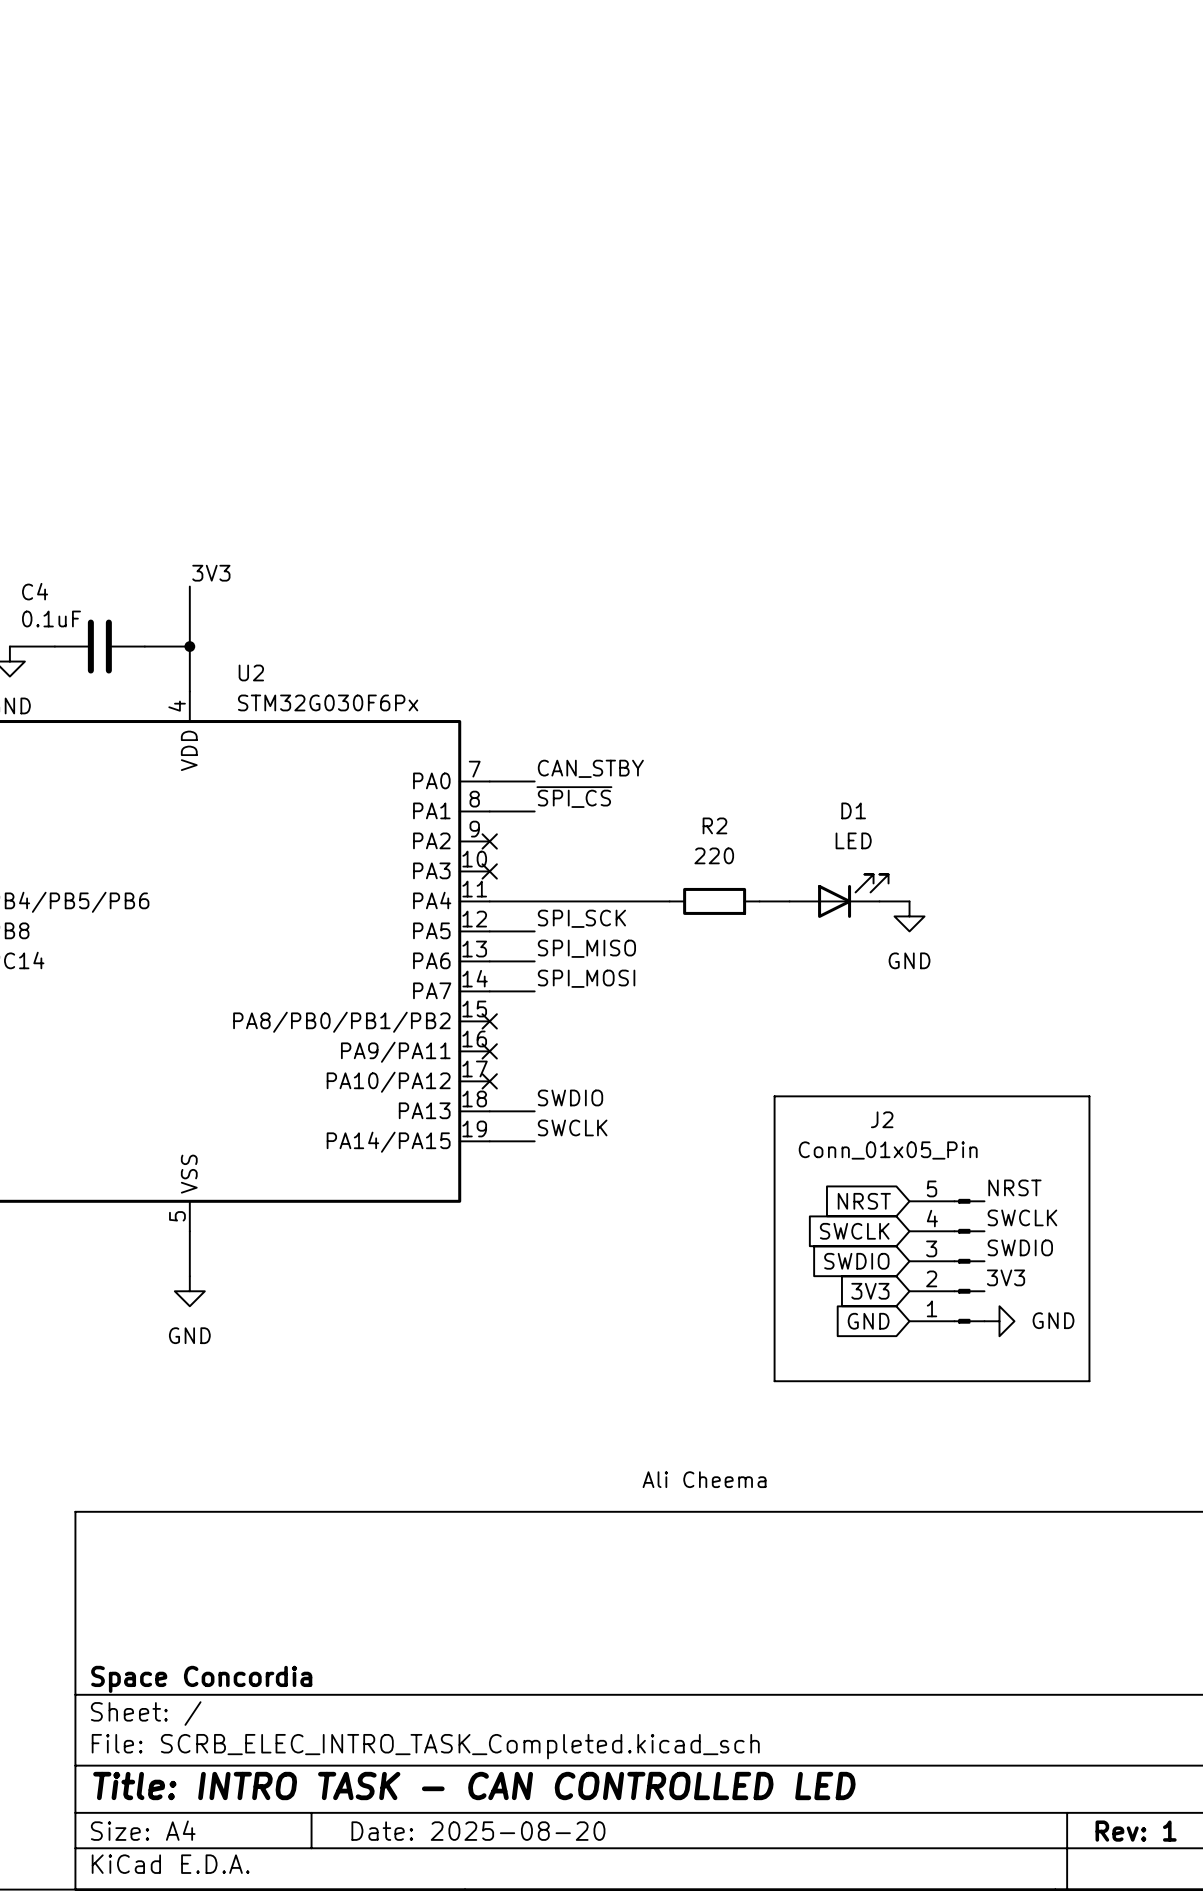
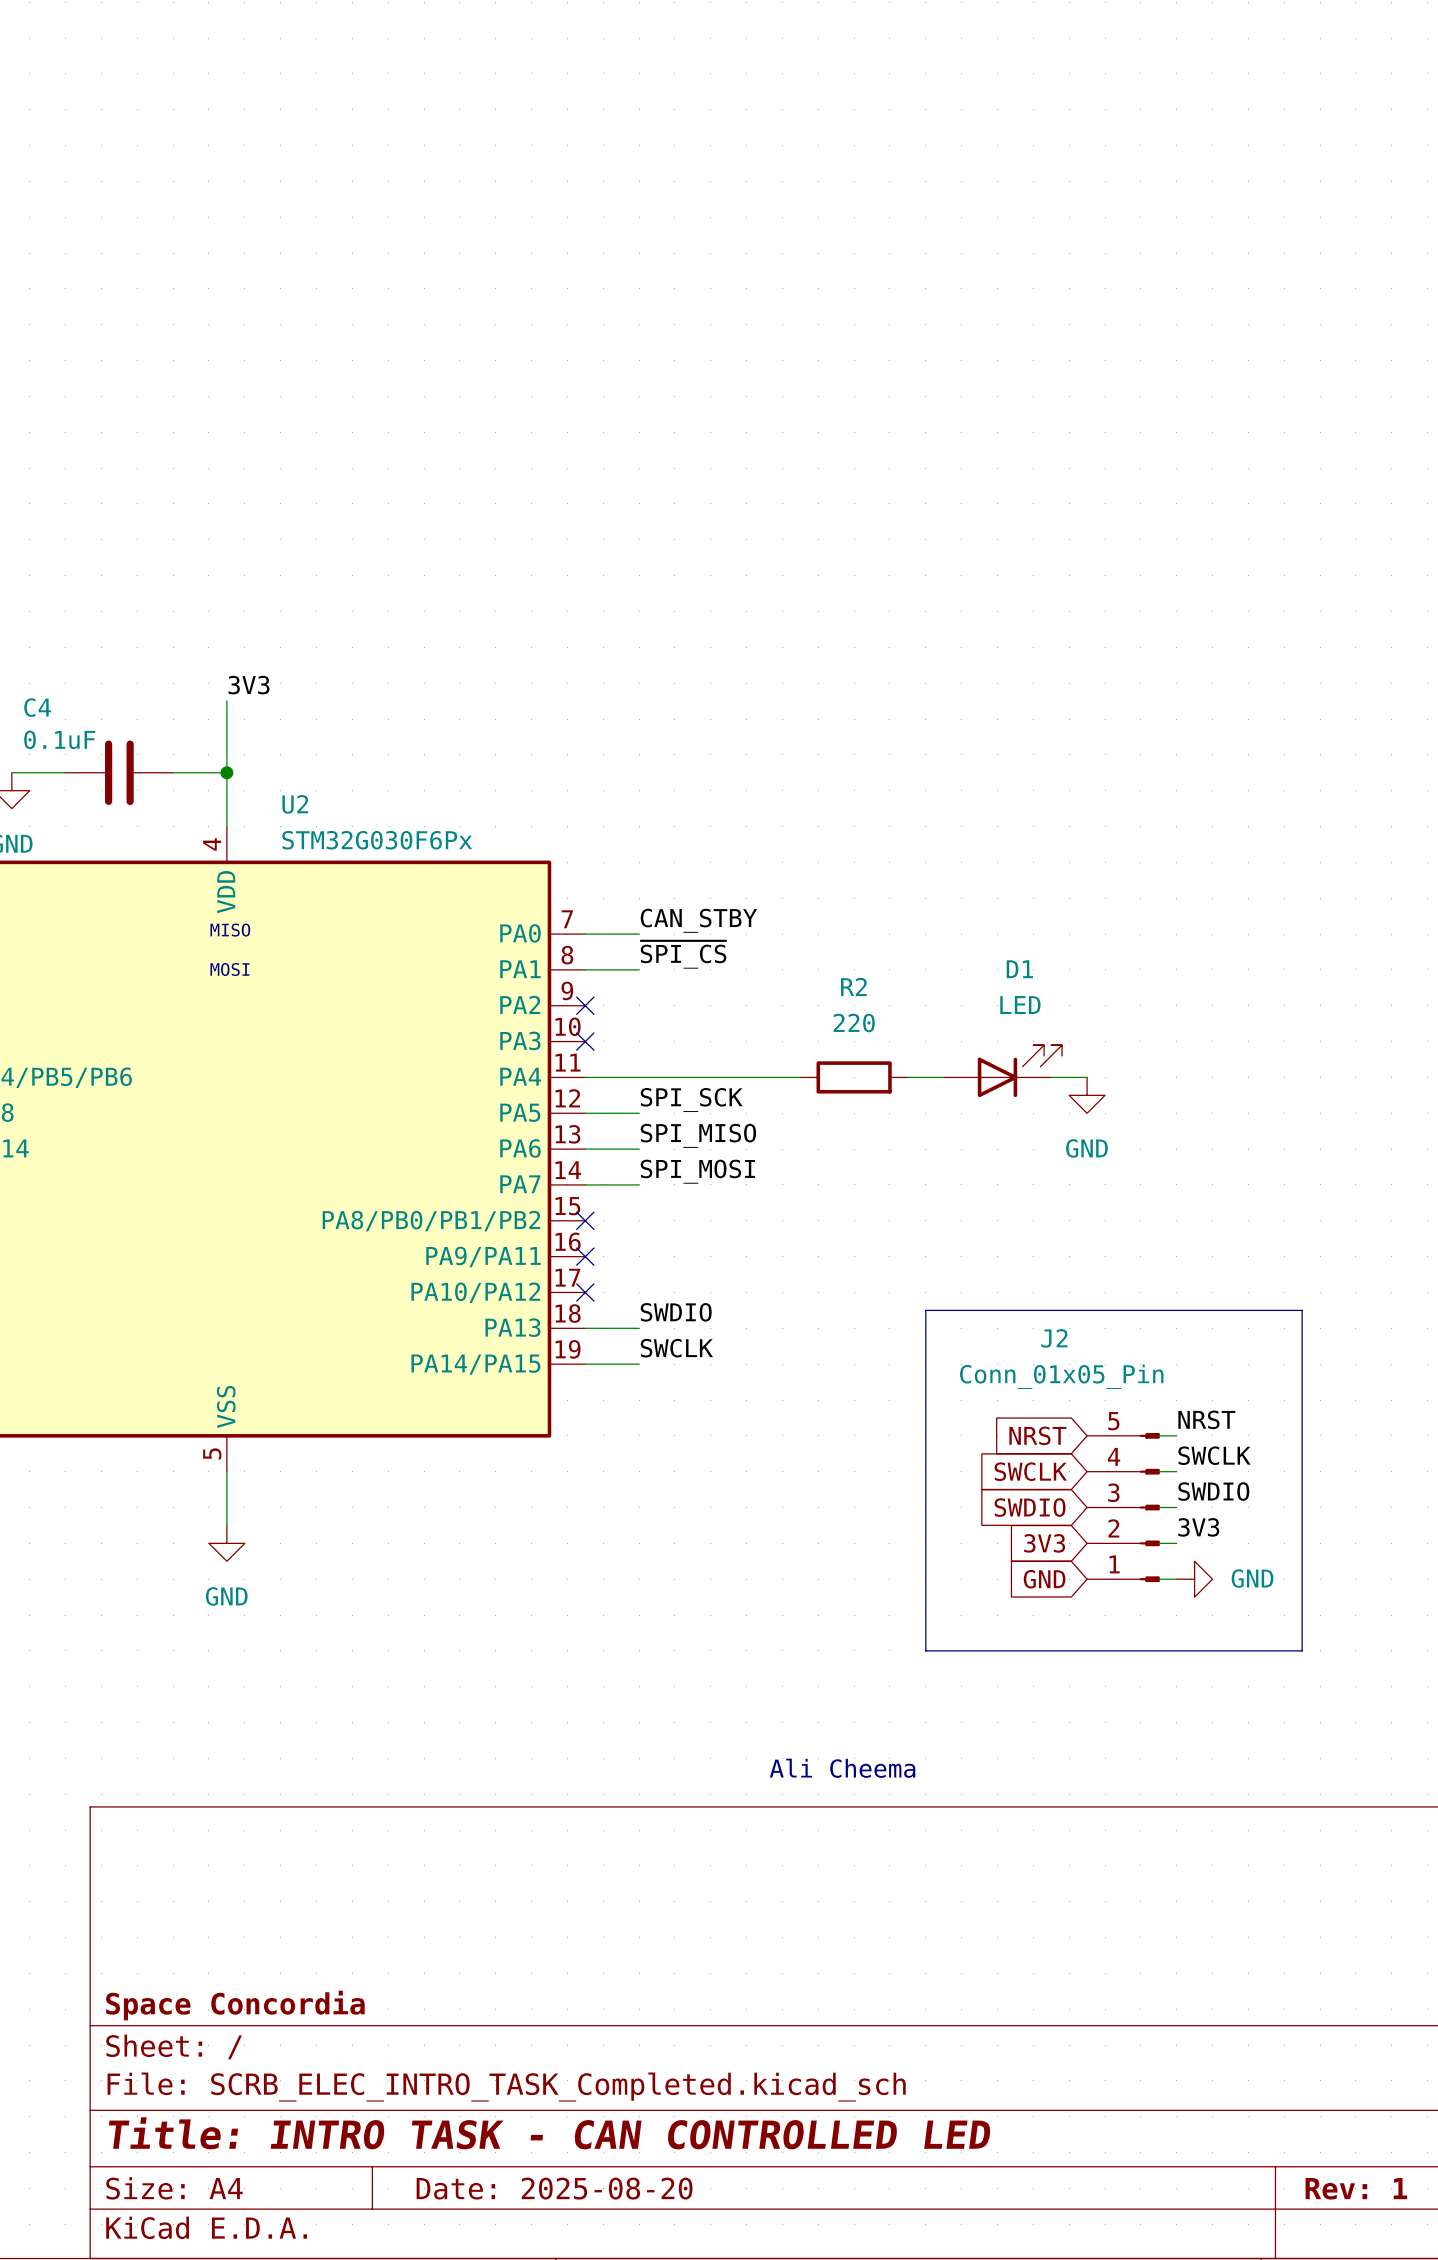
text: none -> MISO (230, 930)
text: none -> MOSI (229, 969)

